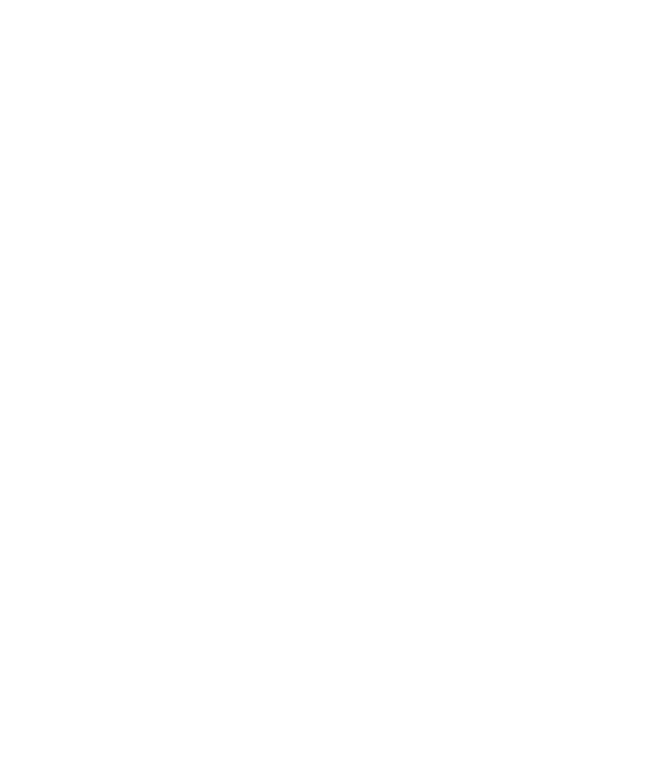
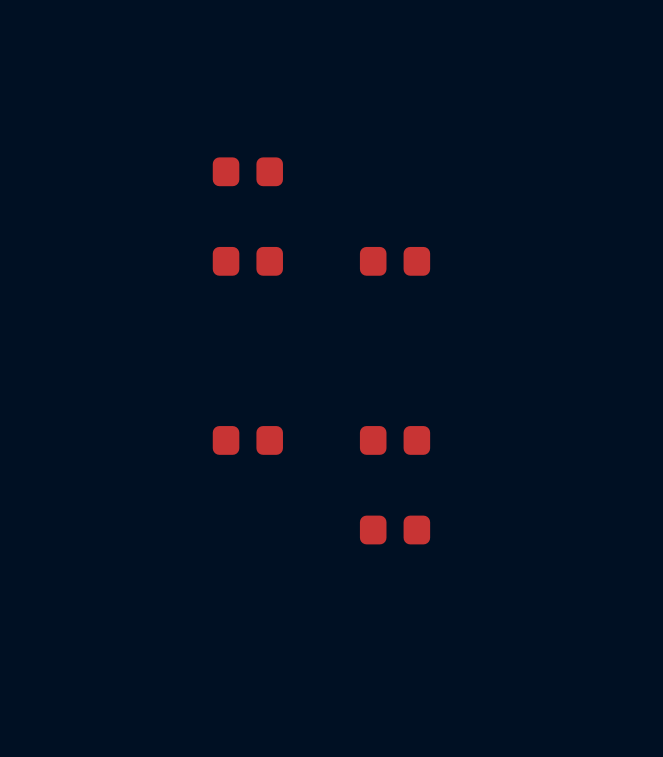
part: none -> (247, 171)
part: none -> (247, 261)
part: none -> (395, 261)
part: none -> (247, 440)
part: none -> (395, 440)
part: none -> (395, 530)

